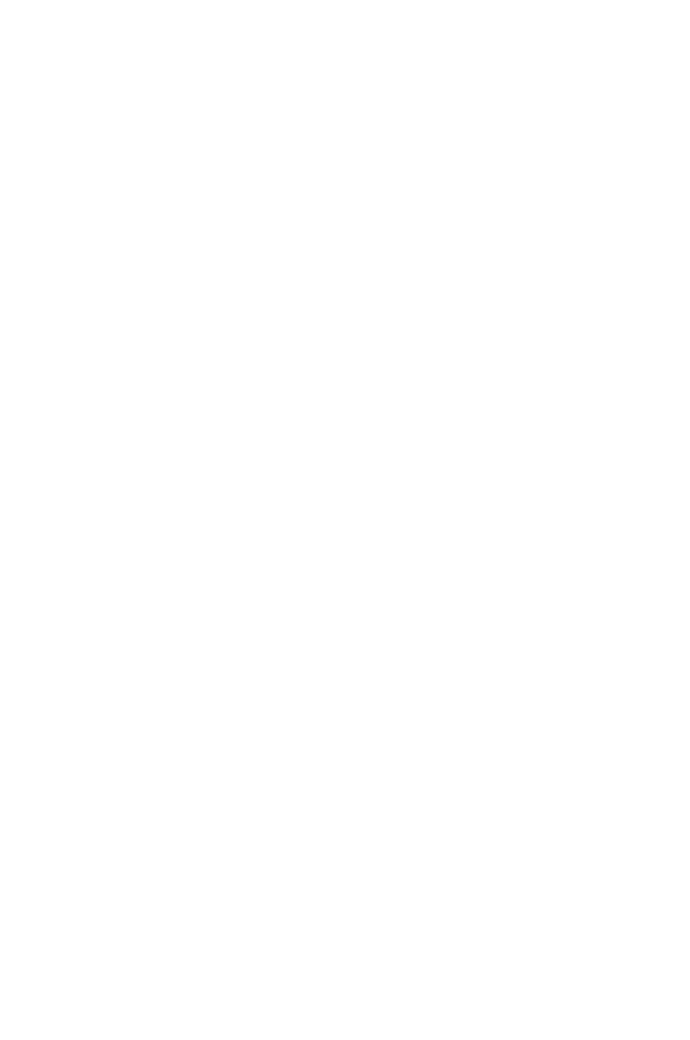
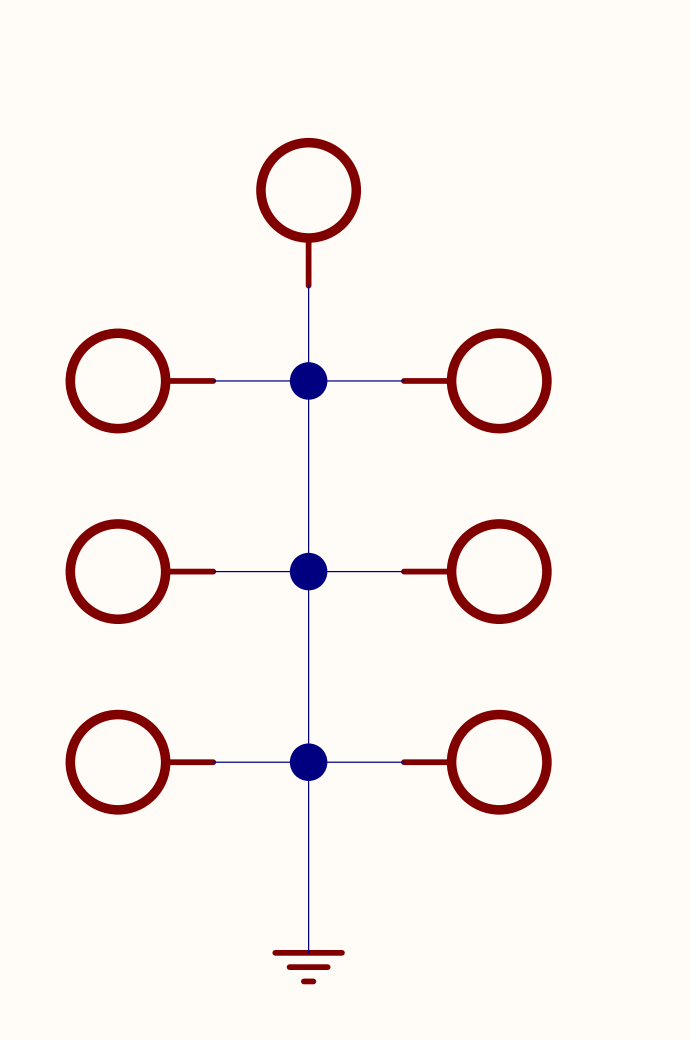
part: none -> (308, 213)
wire: none -> (308, 285) (308, 952)
part: none -> (140, 380)
wire: none -> (213, 380) (403, 380)
junction: none -> (308, 380)
part: none -> (476, 380)
part: none -> (140, 571)
wire: none -> (213, 571) (403, 571)
junction: none -> (308, 571)
part: none -> (476, 571)
part: none -> (140, 762)
wire: none -> (213, 762) (403, 762)
junction: none -> (308, 762)
part: none -> (476, 762)
power symbol: none -> (308, 967)

